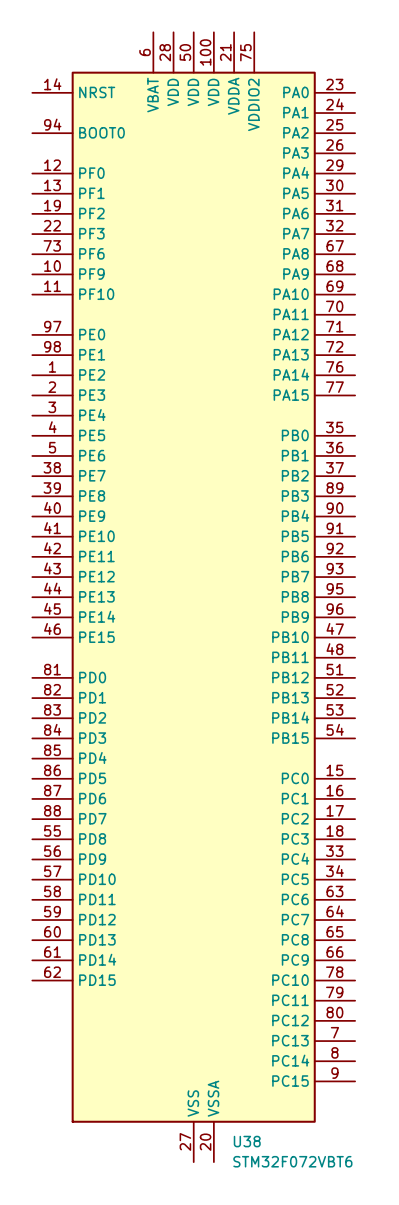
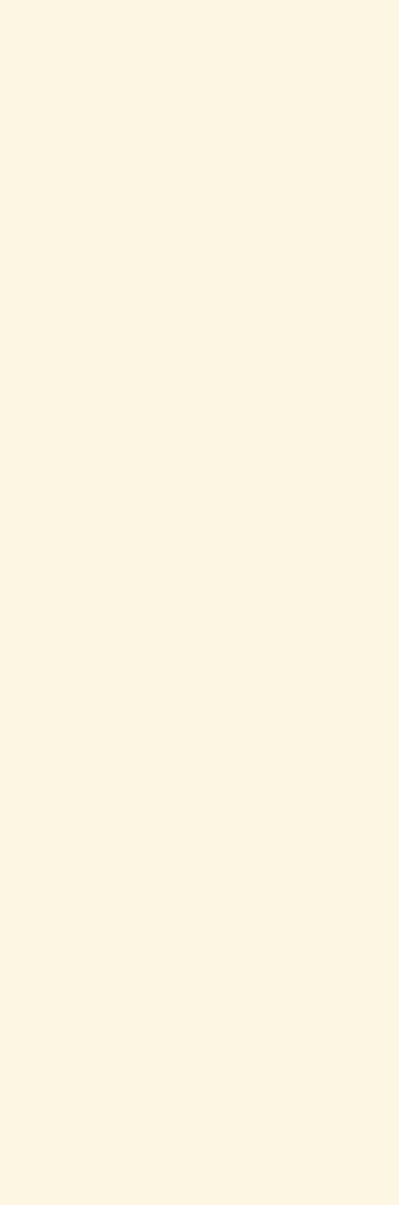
U38: STM32F072VBT6 (193, 597) -> none

